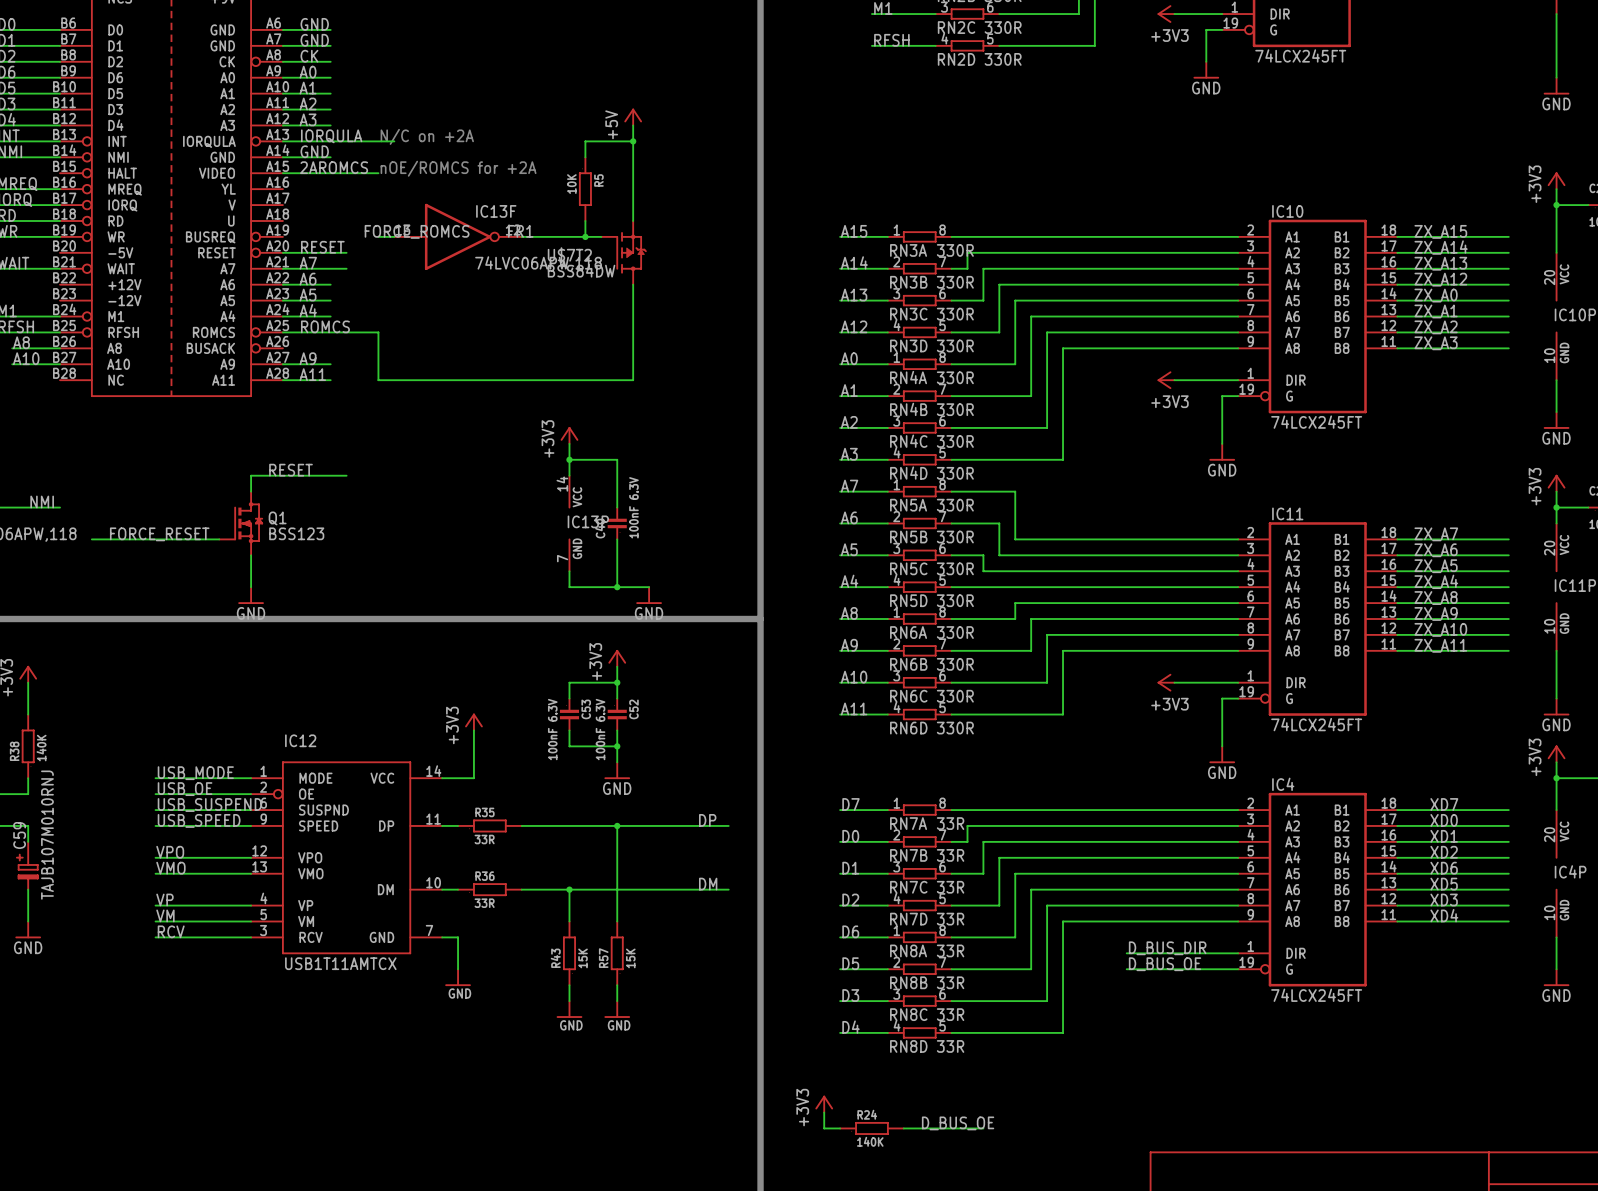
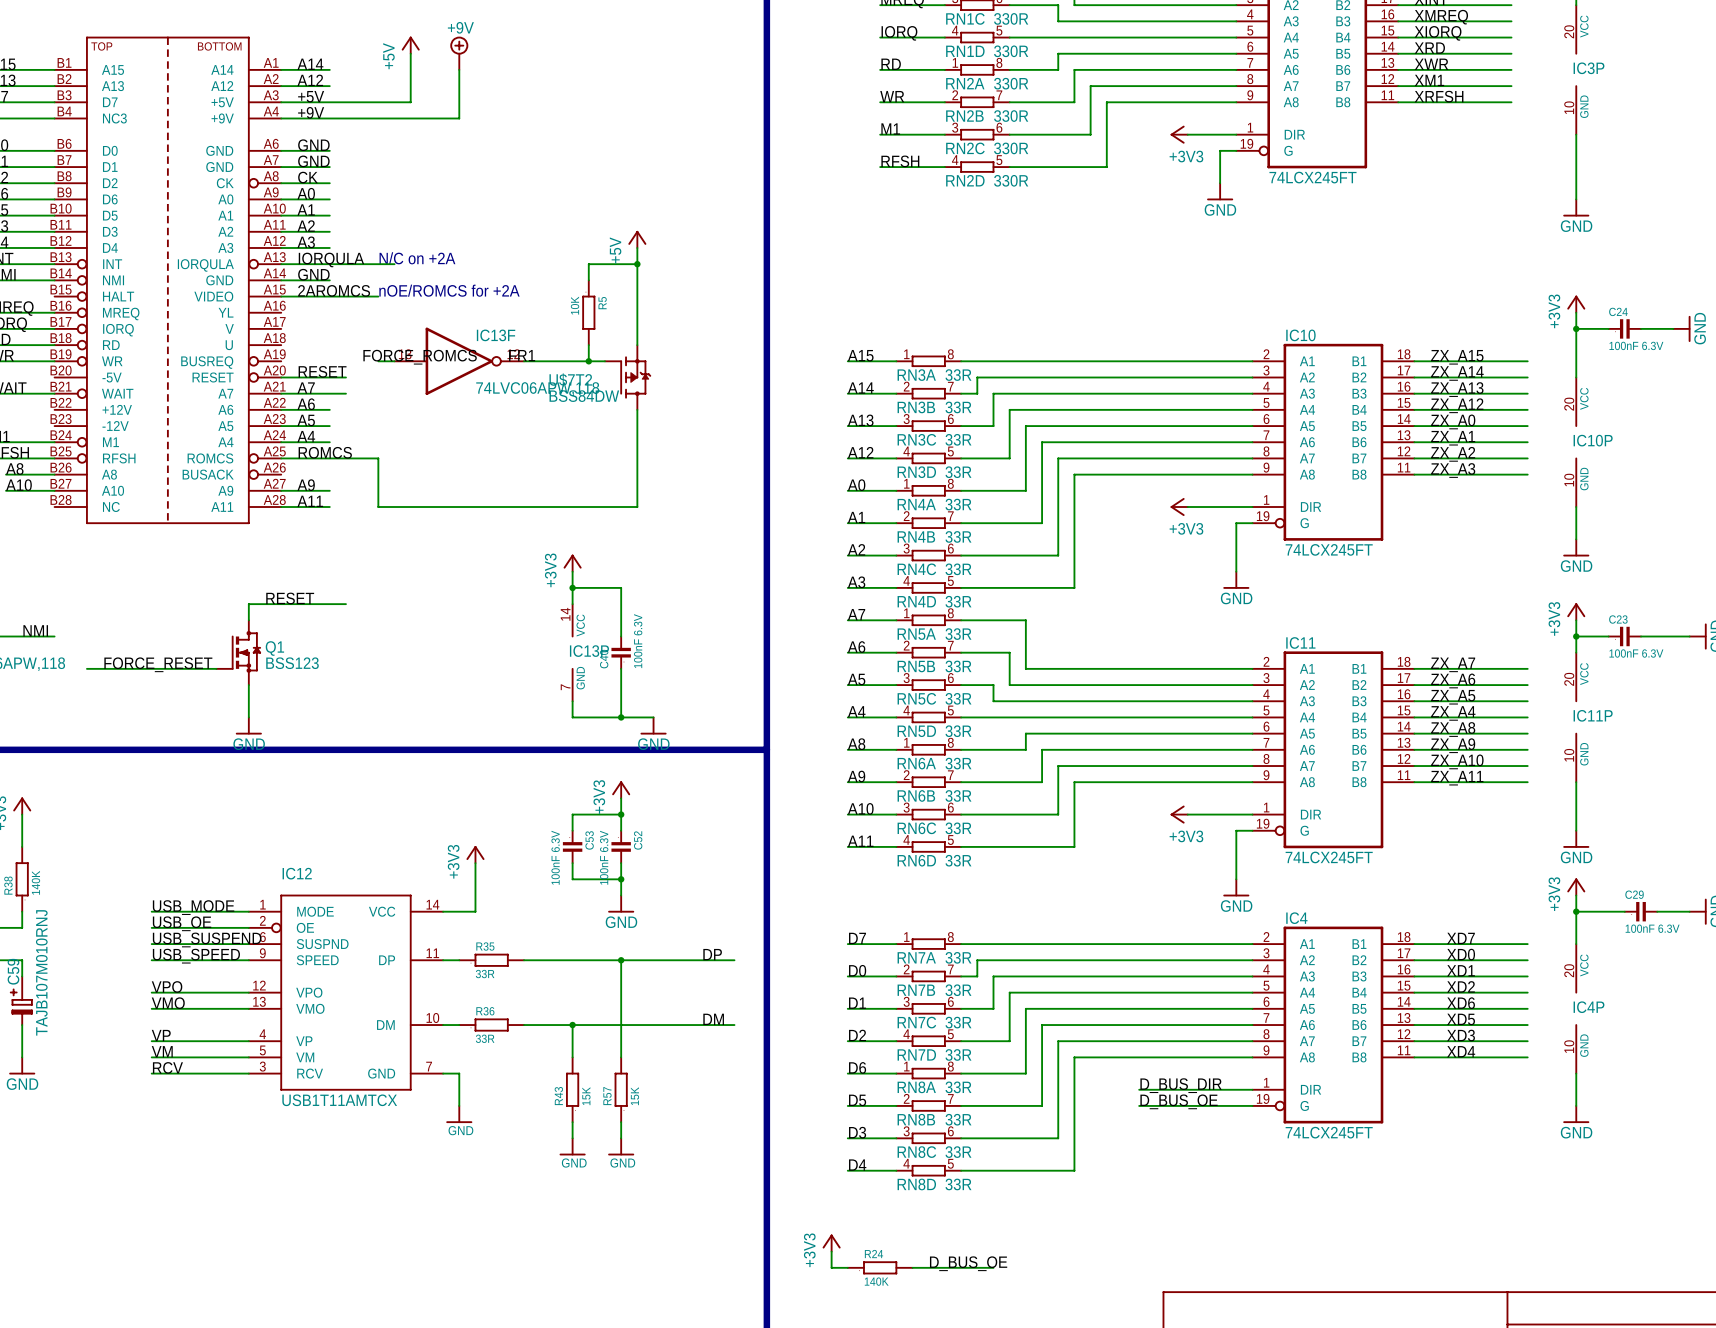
RN3A value: 330R (955, 250) -> 33R (958, 375)
RN3B value: 330R (955, 282) -> 33R (958, 407)
RN3C value: 330R (955, 314) -> 33R (958, 439)
RN3D value: 330R (955, 345) -> 33R (958, 472)
RN4A value: 330R (955, 377) -> 33R (958, 504)
RN4B value: 330R (955, 409) -> 33R (958, 536)
RN4C value: 330R (955, 441) -> 33R (958, 569)
RN4D value: 330R (955, 473) -> 33R (958, 601)
RN5A value: 330R (955, 505) -> 33R (958, 634)
RN5B value: 330R (955, 537) -> 33R (958, 666)
RN5C value: 330R (955, 568) -> 33R (958, 698)
RN5D value: 330R (955, 600) -> 33R (958, 731)
RN6A value: 330R (955, 632) -> 33R (958, 763)
RN6B value: 330R (955, 664) -> 33R (958, 795)
RN6C value: 330R (955, 696) -> 33R (958, 828)
RN6D value: 330R (955, 728) -> 33R (958, 860)

